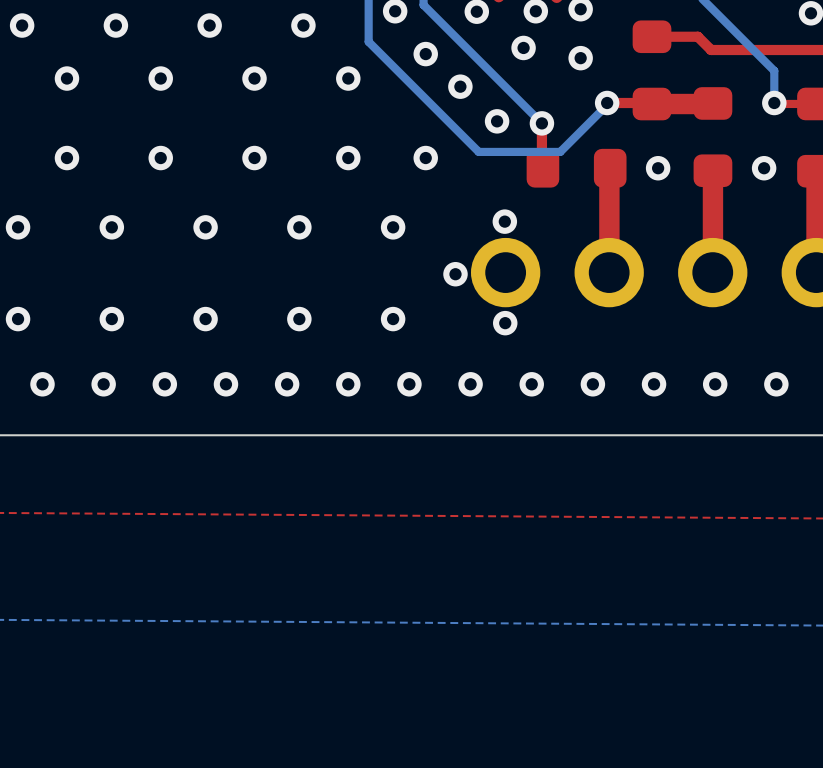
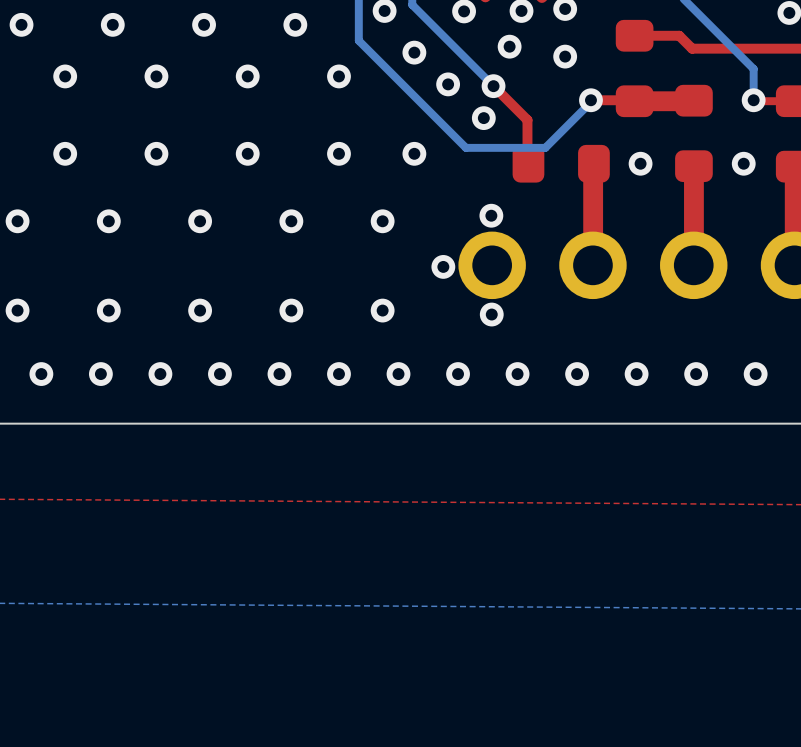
top track: none -> (493, 86) (527, 120)
bottom track: (507, 88) (541, 123) -> none
via position: (541, 123) -> (493, 86)

